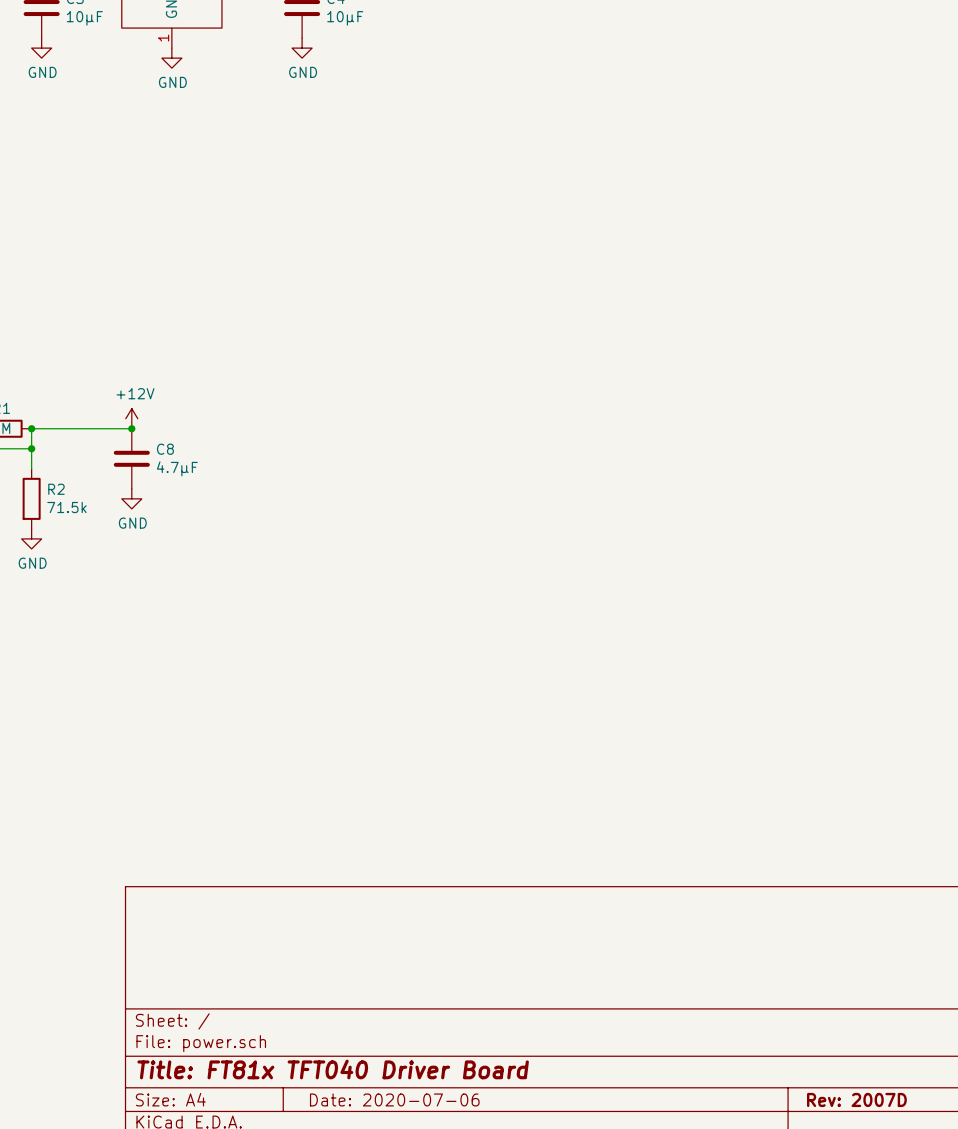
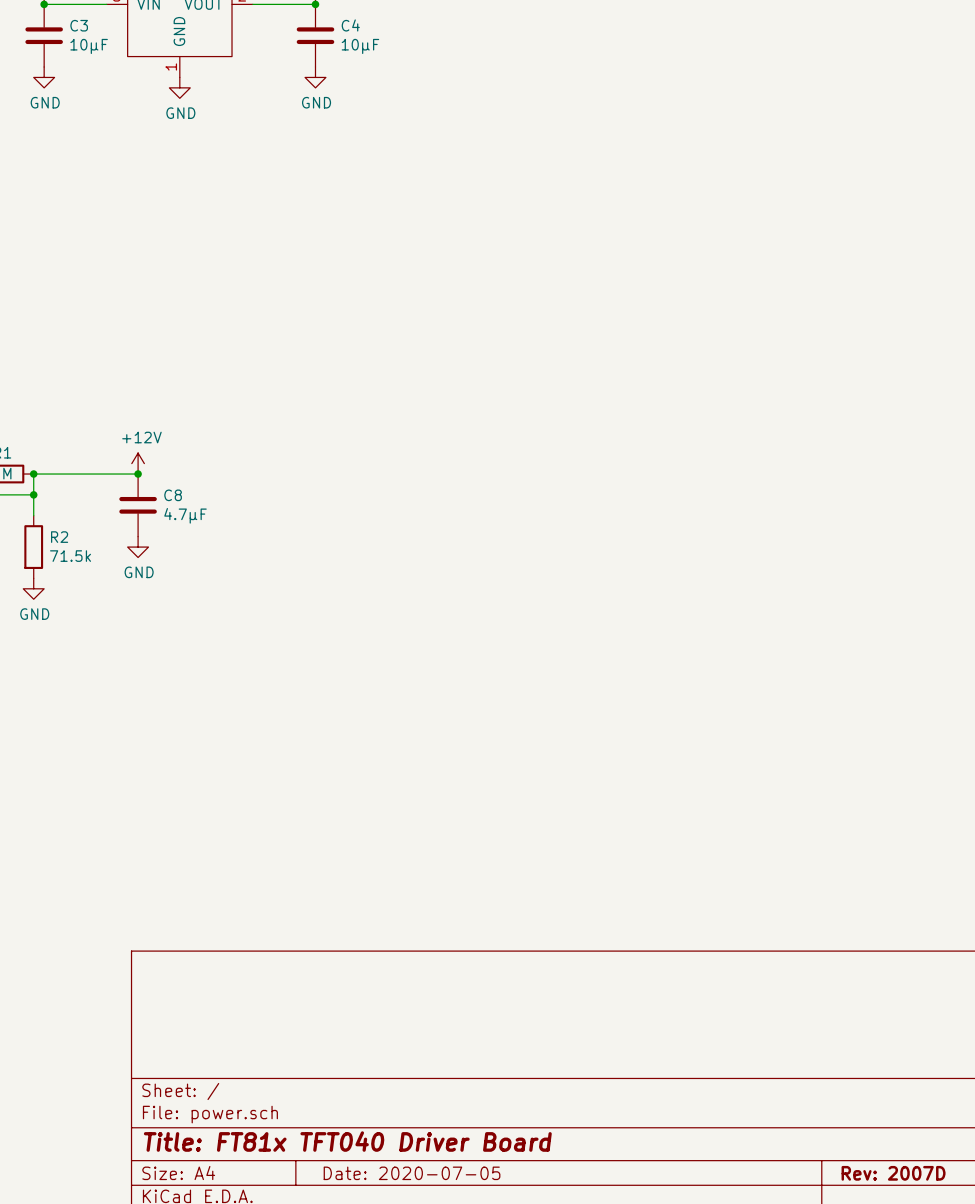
title block: Date: 2020-07-06 (394, 1099) -> Date: 2020-07-05 (412, 1173)

